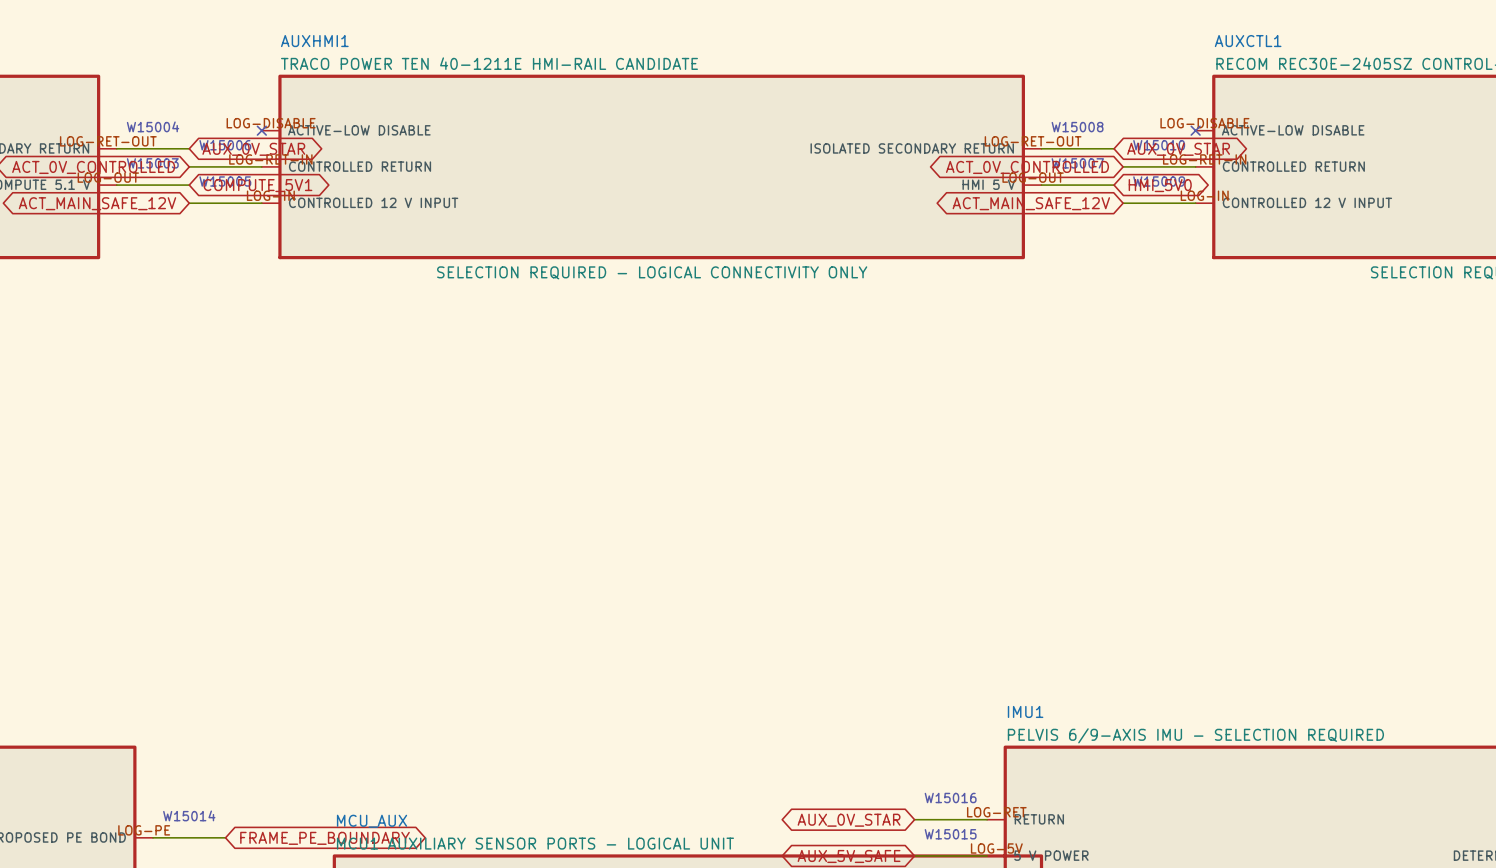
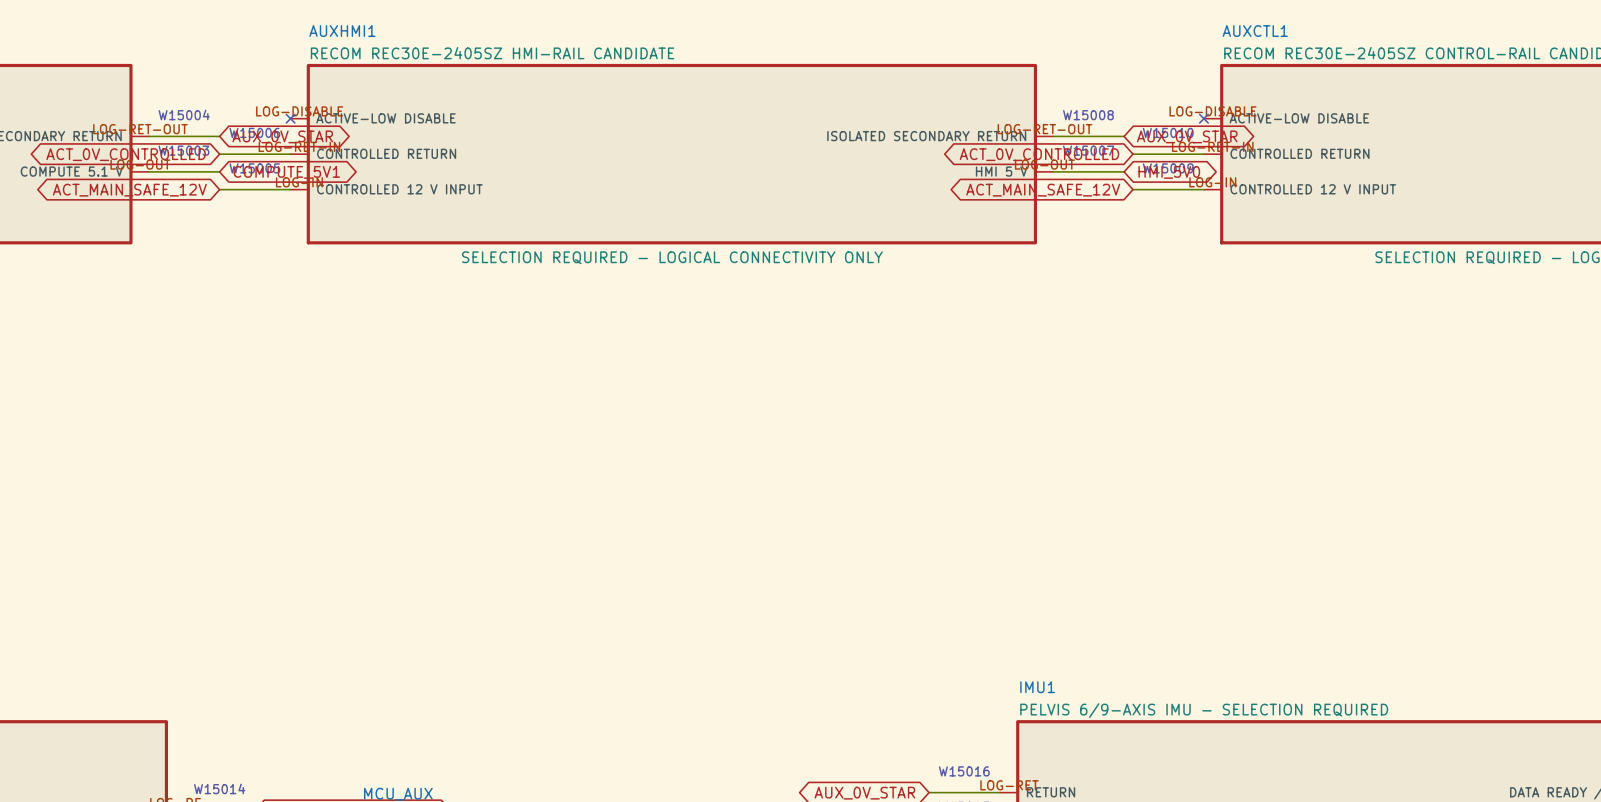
AUXHMI1 text: TRACO POWER TEN 40-1211E HMI-RAIL CANDIDATE (489, 63) -> RECOM REC30E-2405SZ HMI-RAIL CANDIDATE (492, 53)

